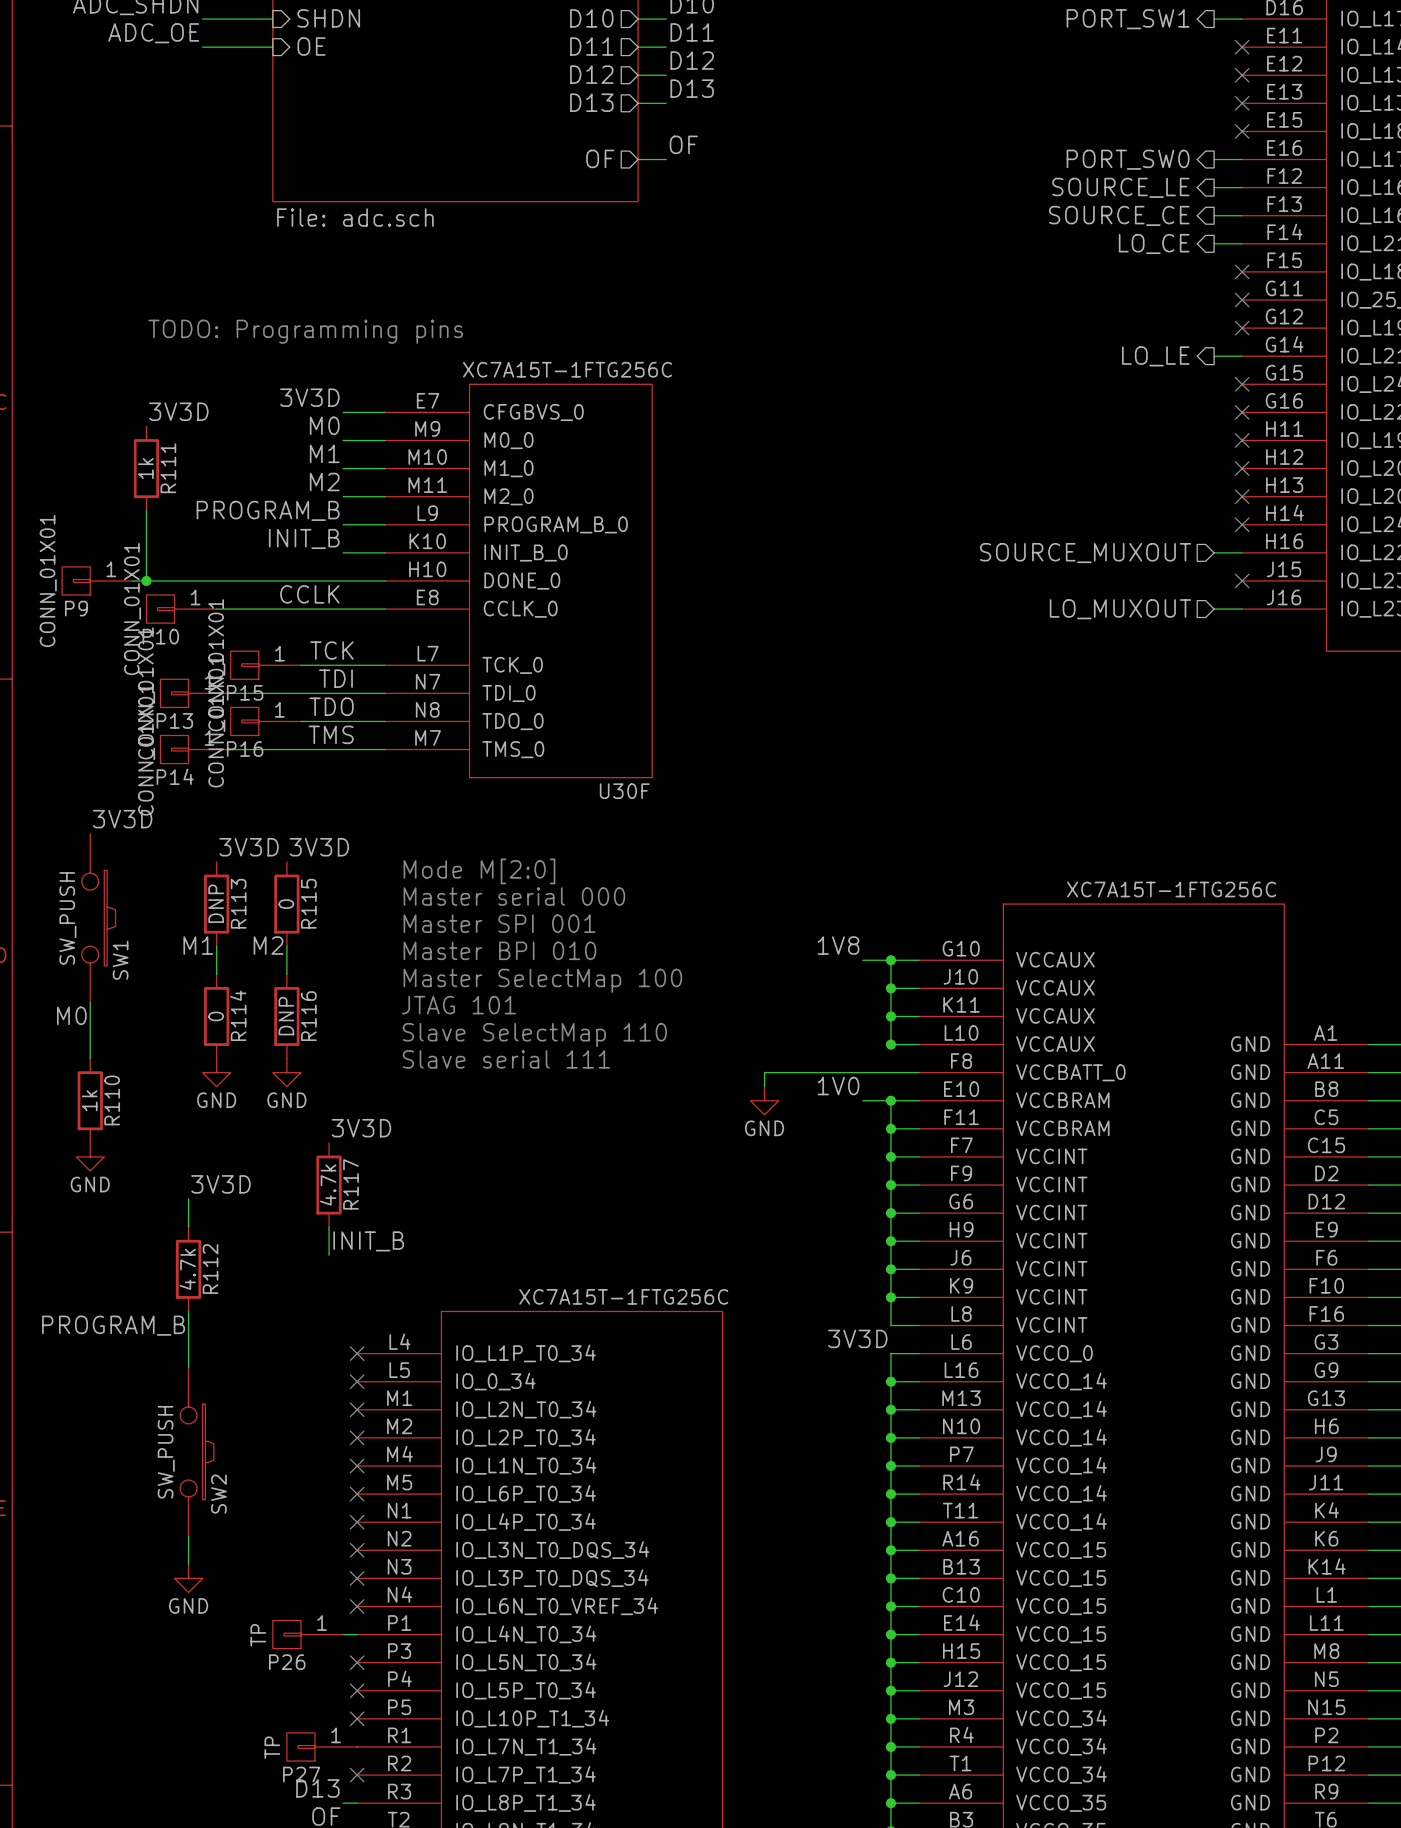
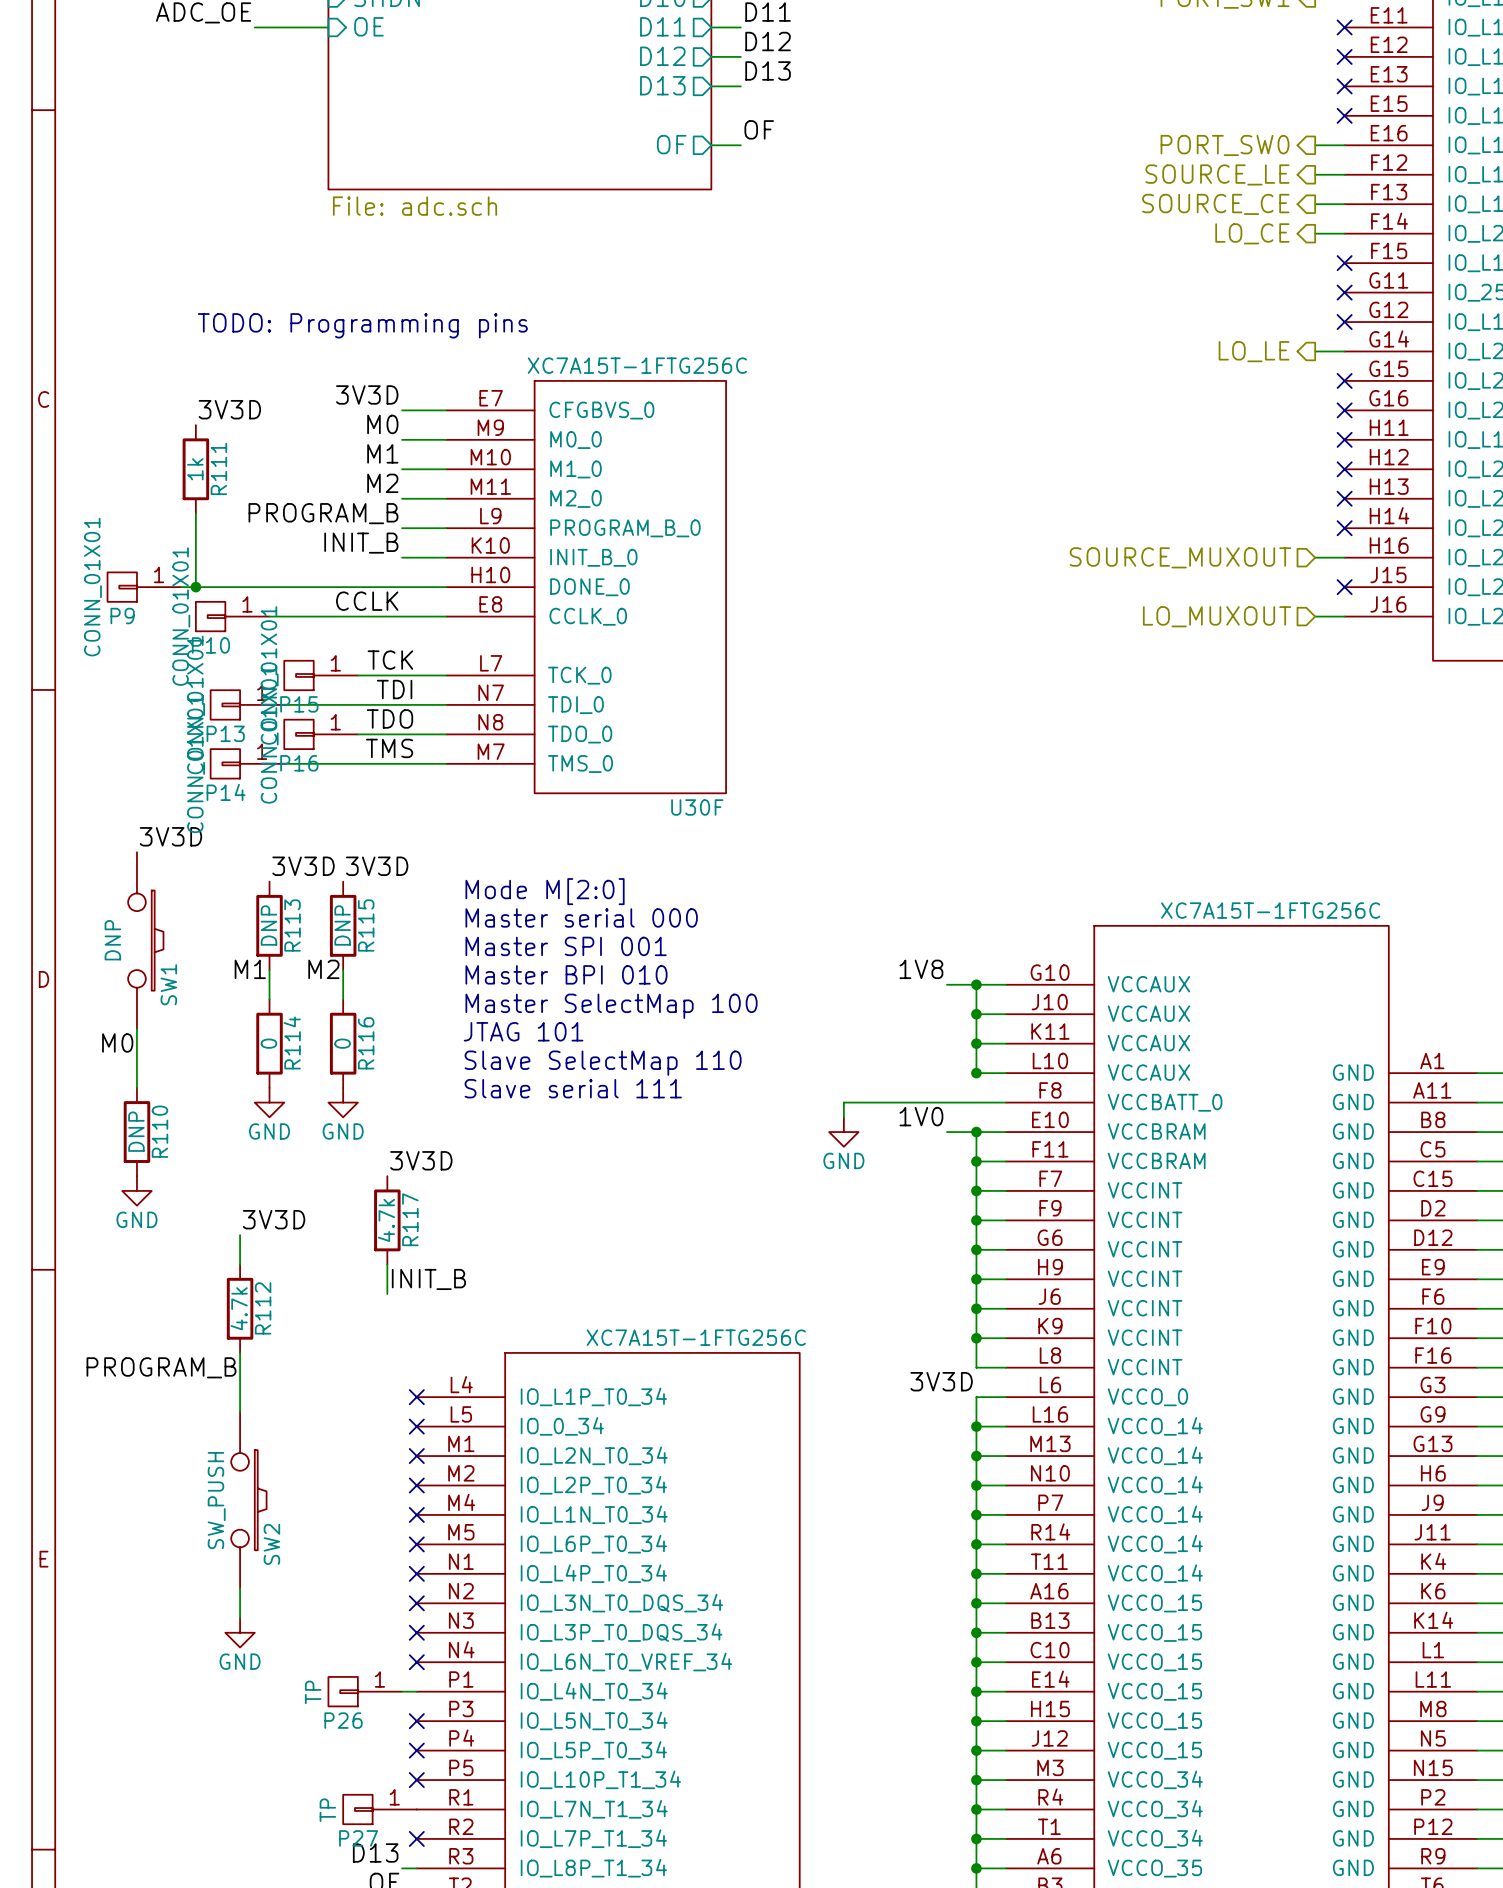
R115 value: 0 (286, 904) -> DNP (342, 925)
SW1 value: SW_PUSH (67, 918) -> DNP (112, 940)
R116 value: DNP (286, 1016) -> 0 (342, 1043)
R110 value: 1k (89, 1100) -> DNP (136, 1131)

